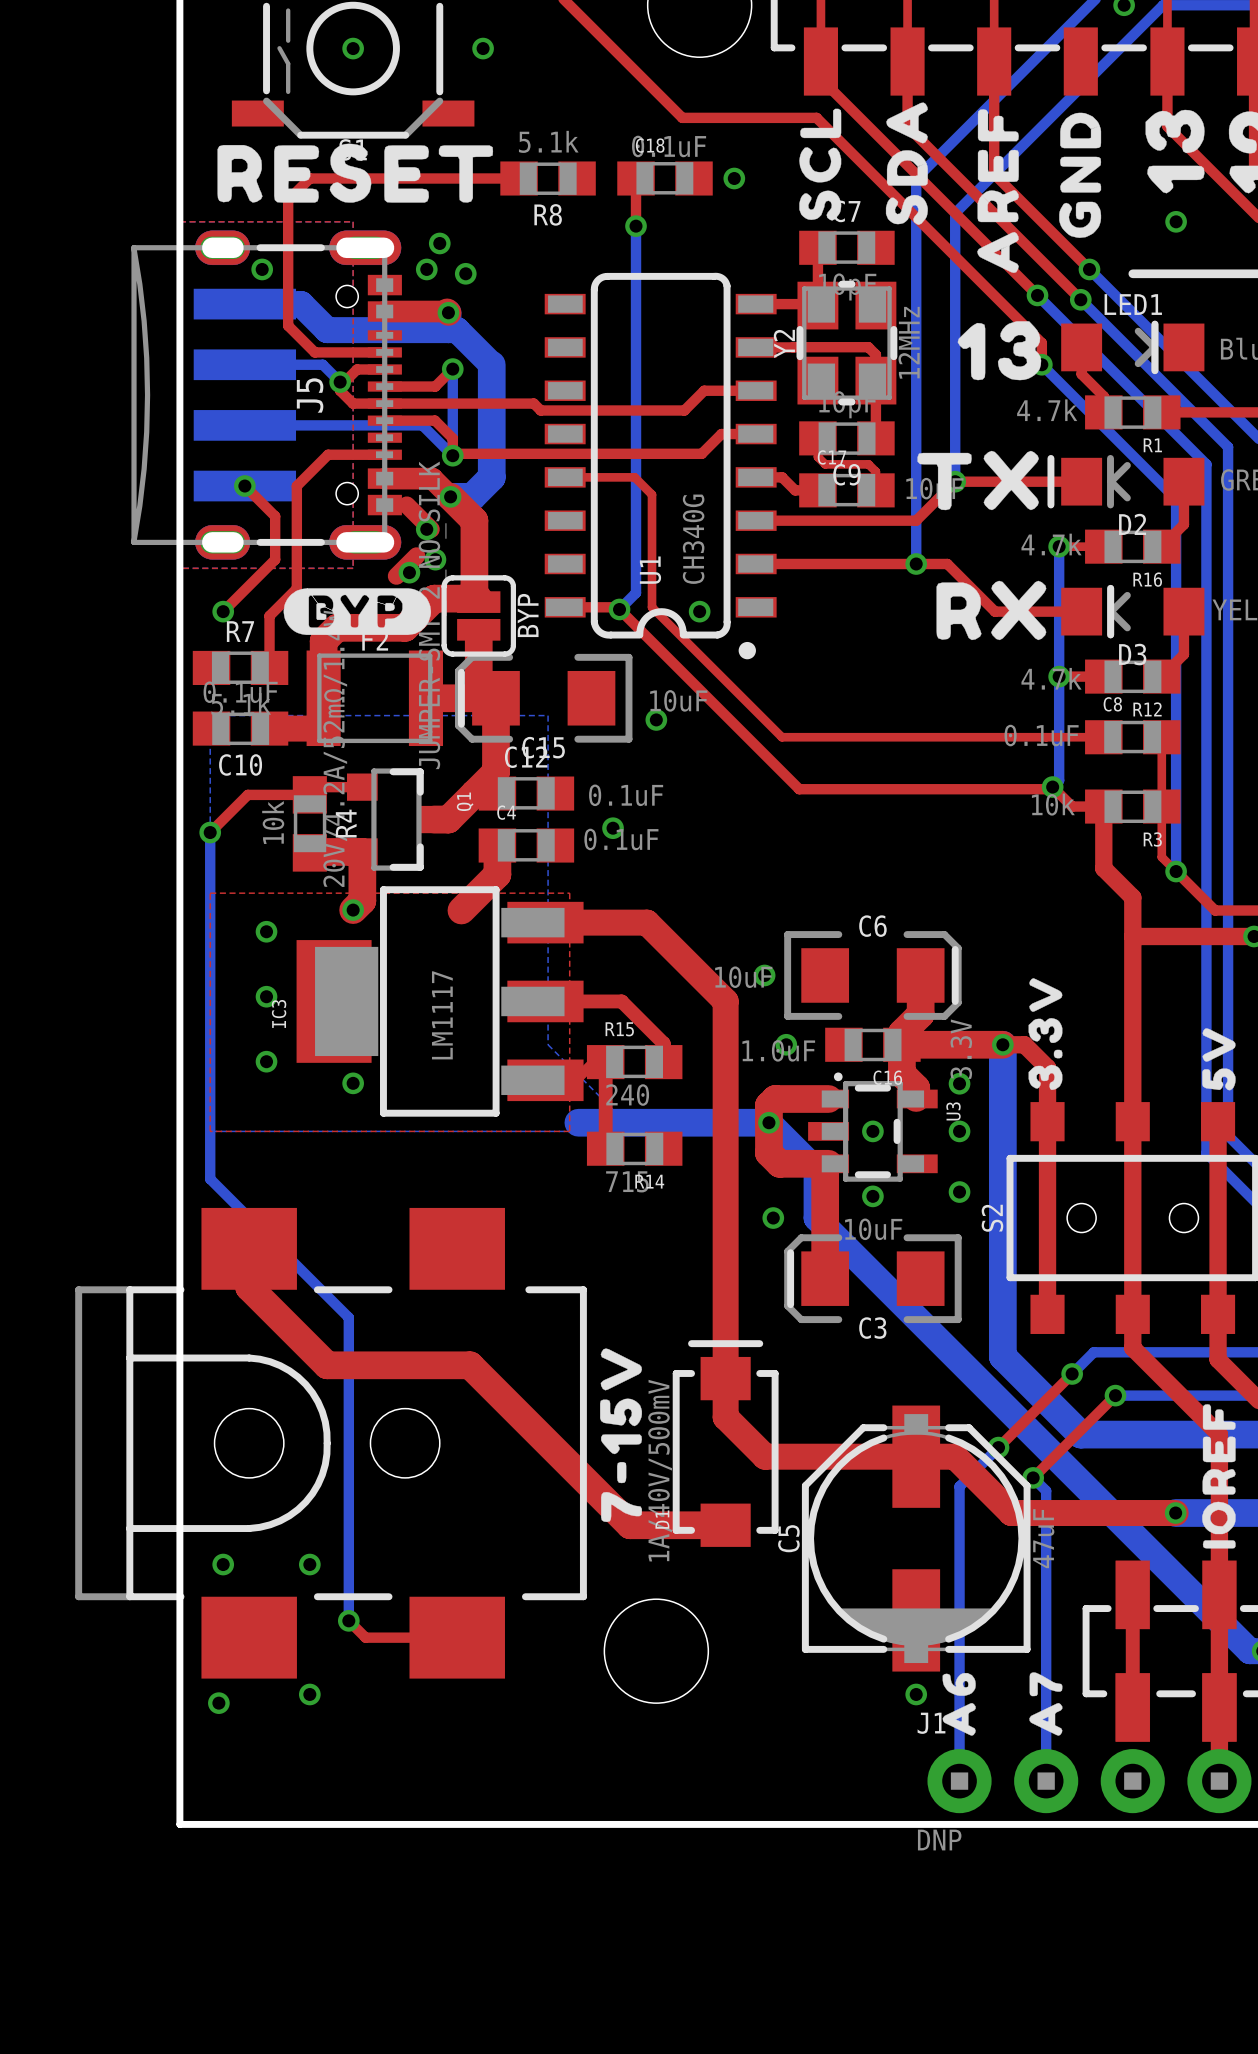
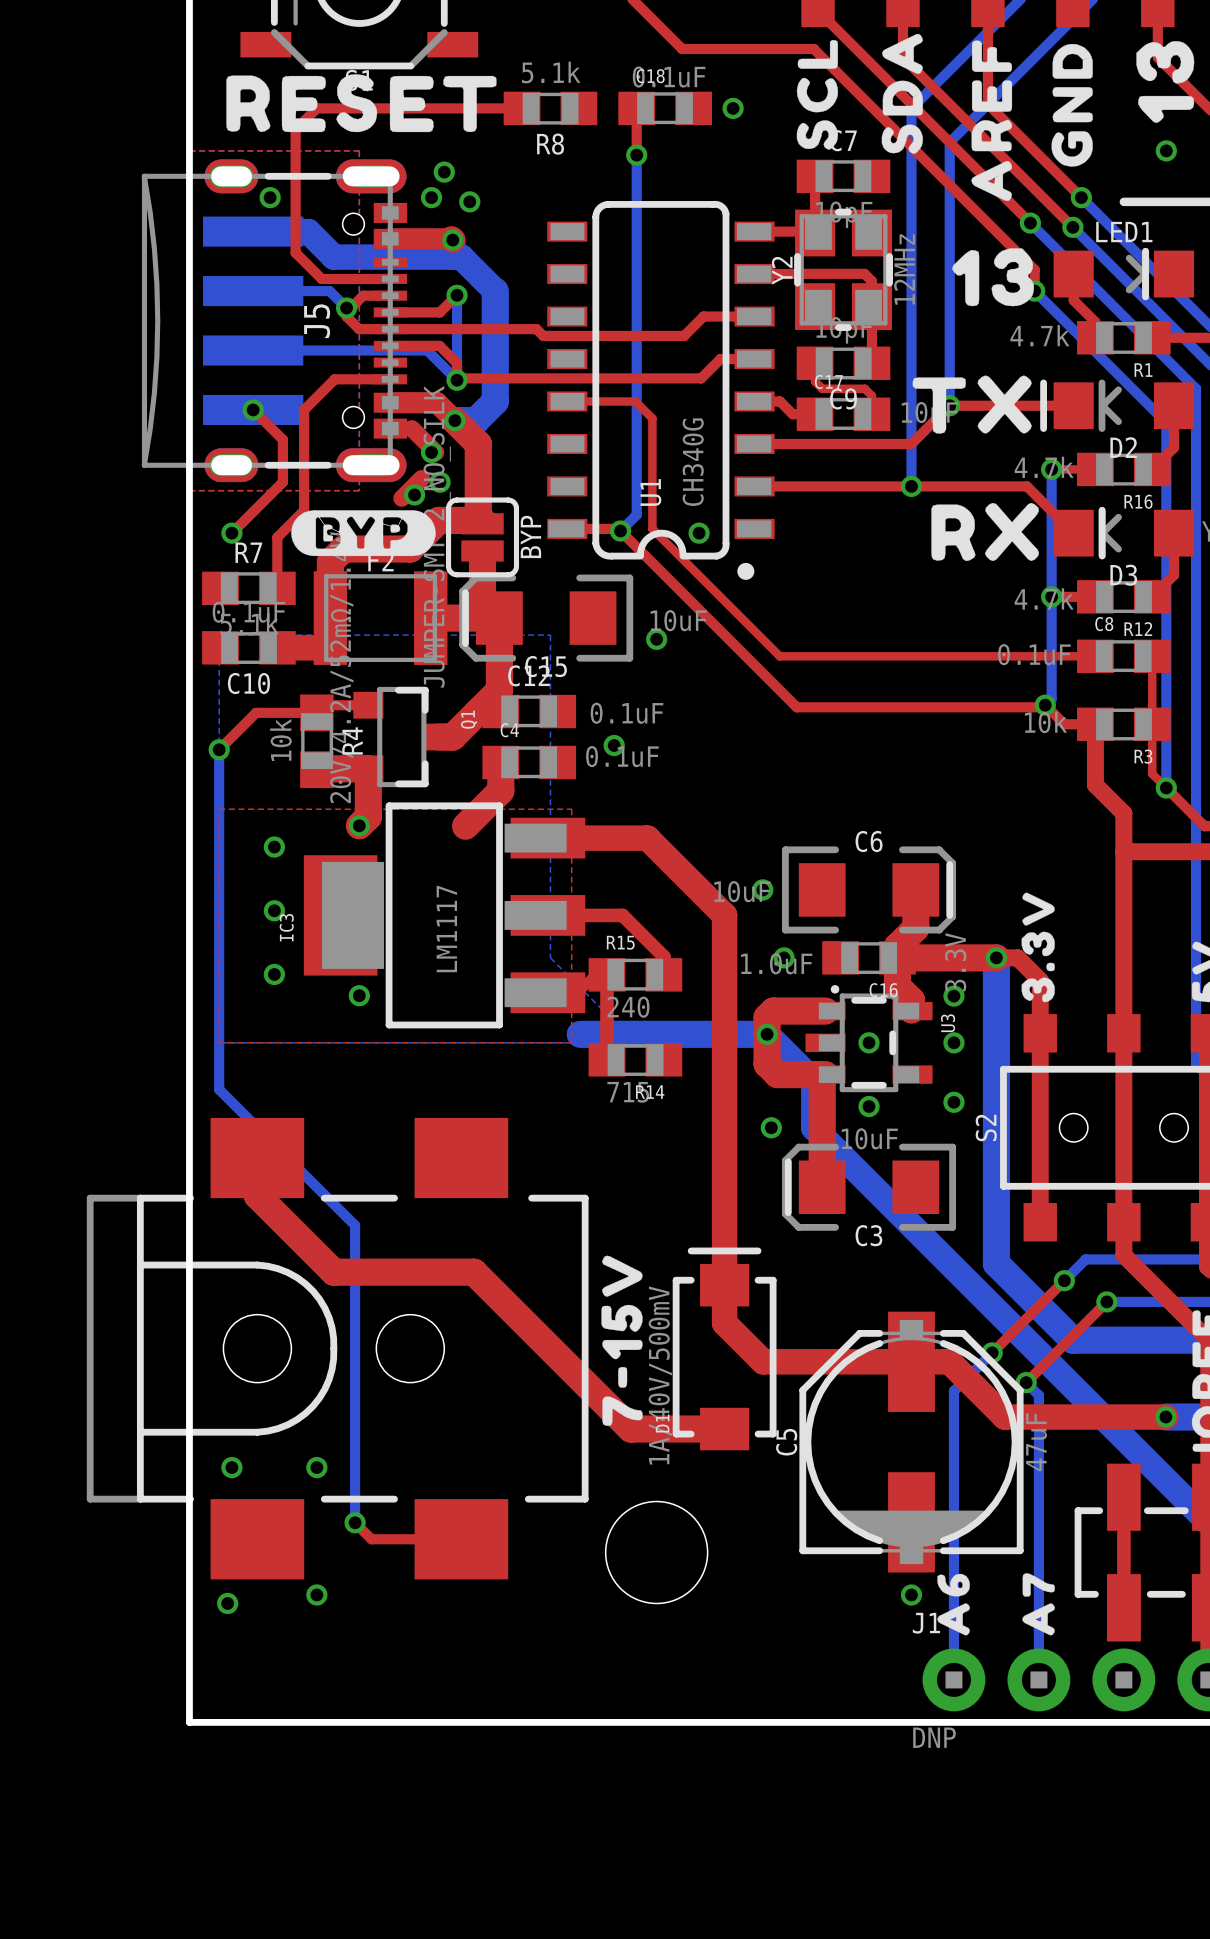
top track: (947, 563) (995, 611) (1081, 611) -> (942, 486) (1026, 486) (1073, 533)

